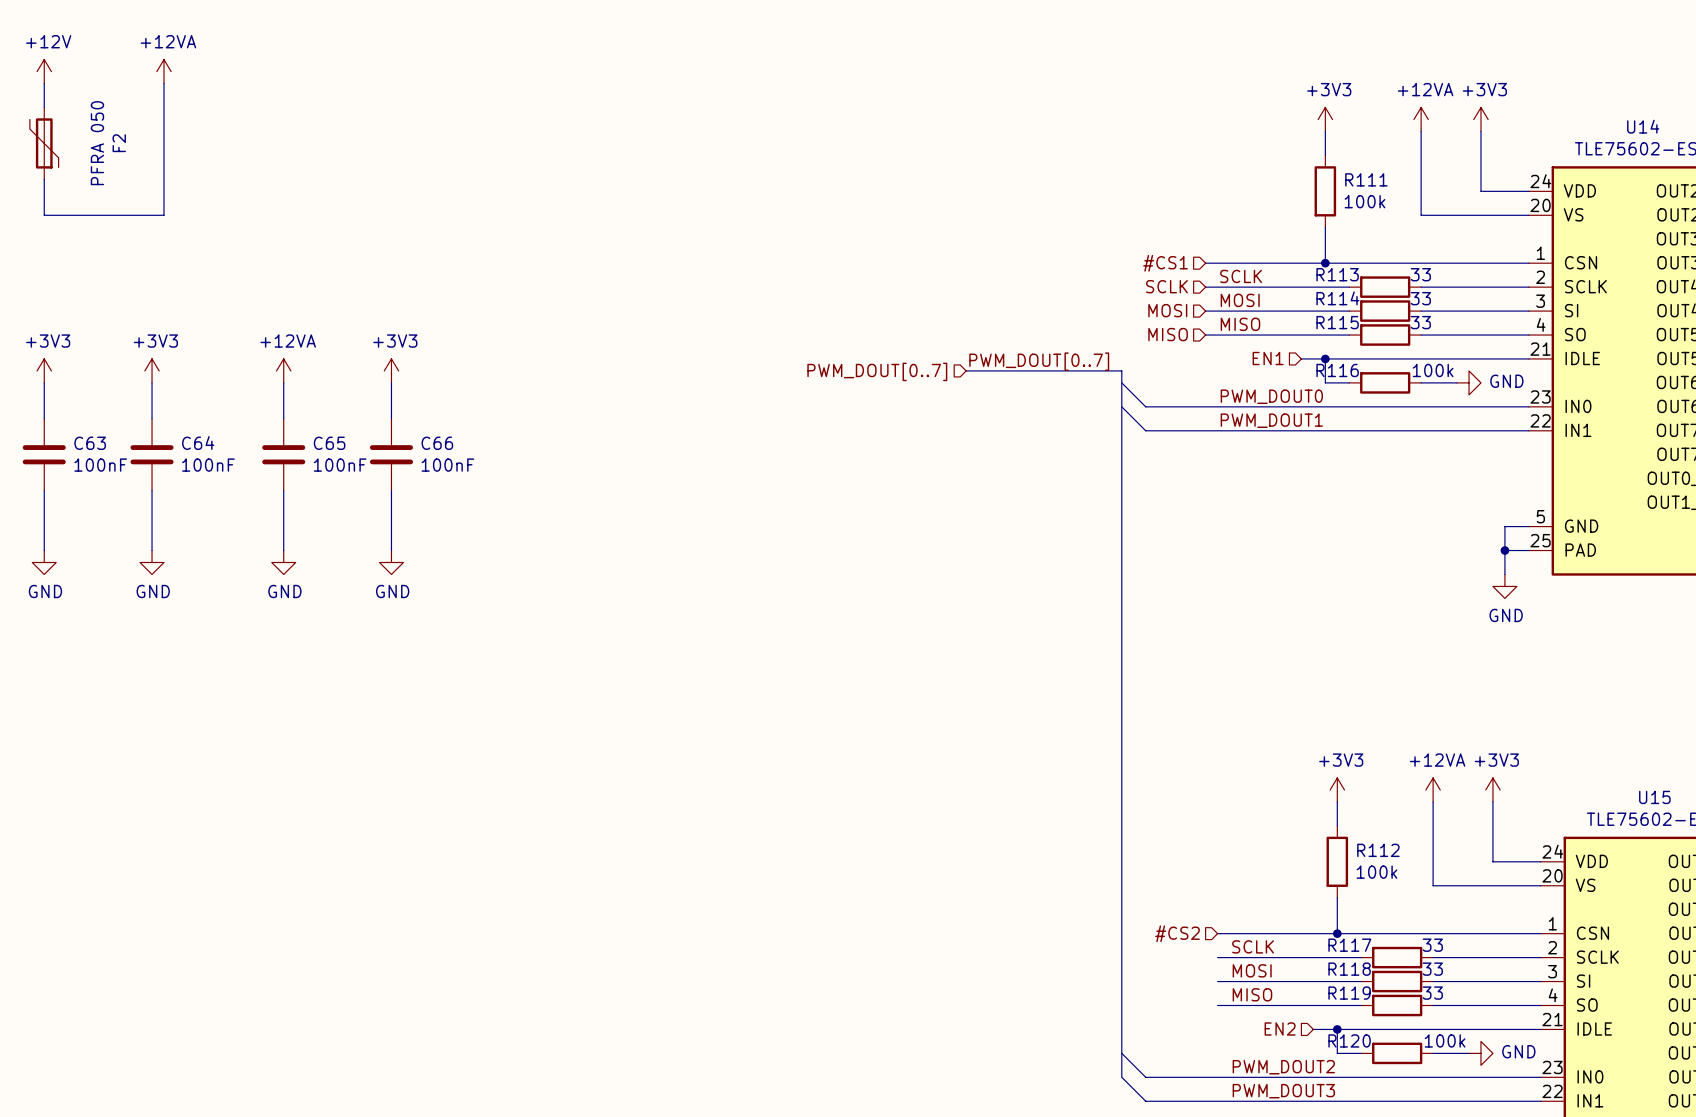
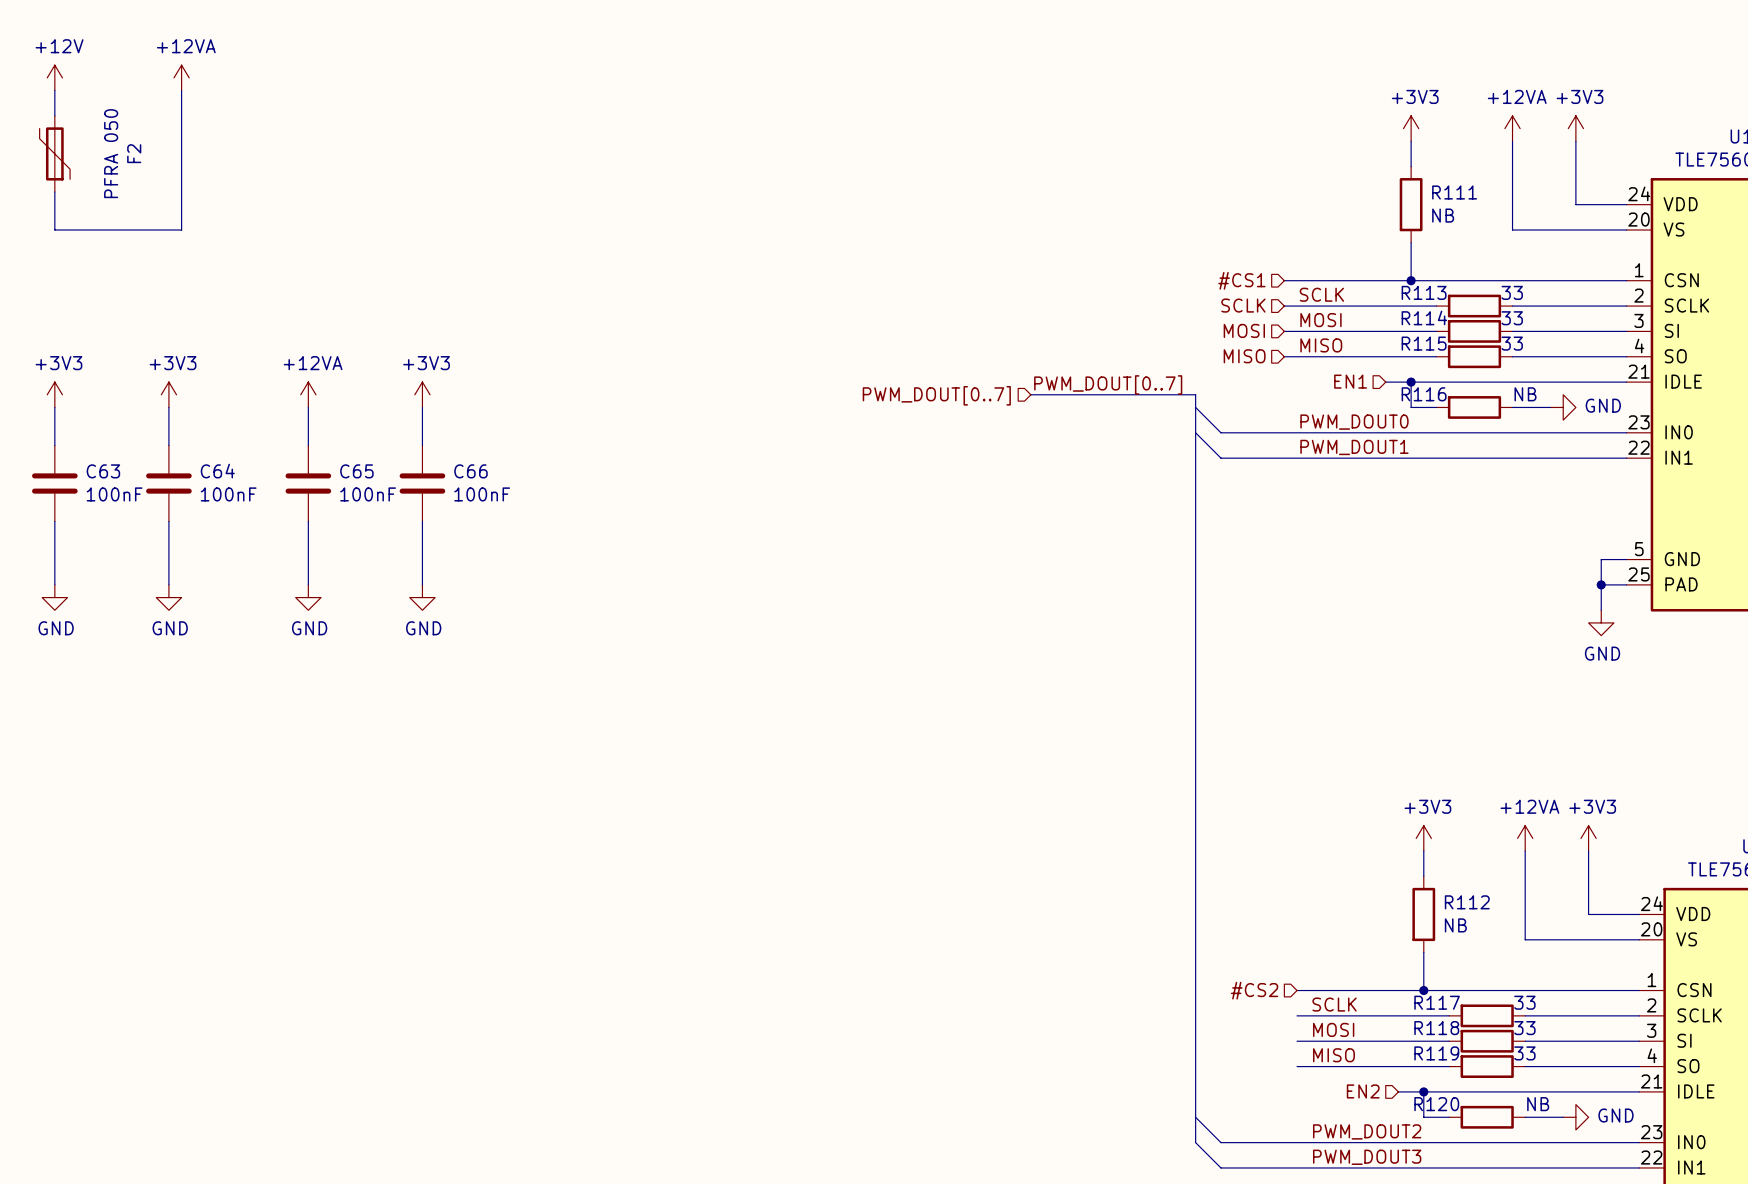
R111 value: 100k (1365, 201) -> NB (1443, 215)
R116 value: 100k (1433, 370) -> NB (1525, 394)
R112 value: 100k (1376, 872) -> NB (1455, 925)
R120 value: 100k (1445, 1040) -> NB (1538, 1104)

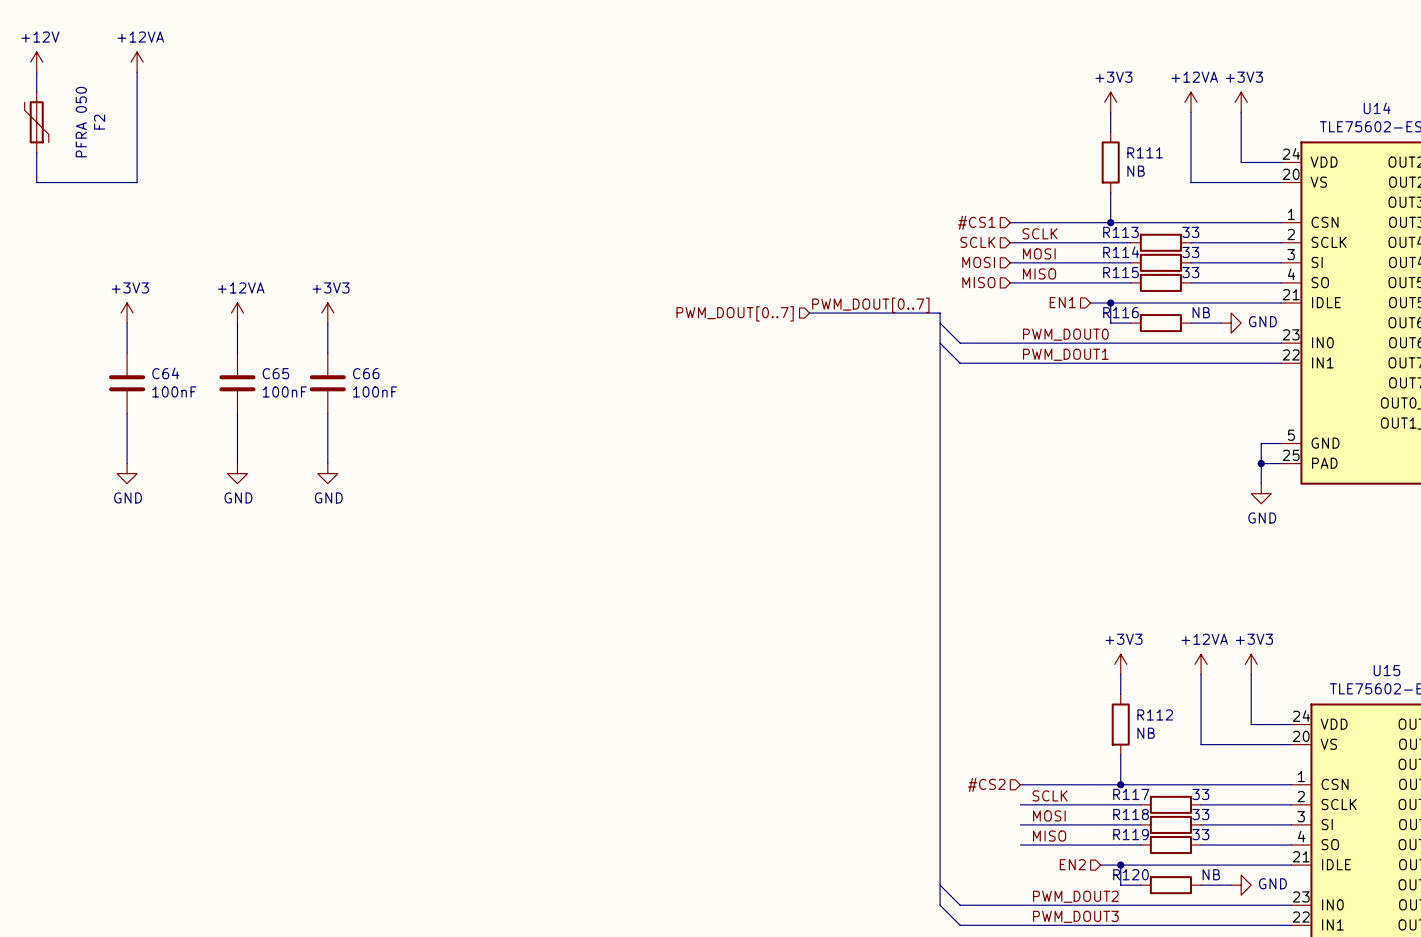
power symbol: +3V3 (54, 394) -> none
wire: (54, 407) (54, 445) -> none
C63: 100nF (54, 483) -> none
wire: (54, 521) (54, 584) -> none
power symbol: GND (54, 597) -> none

